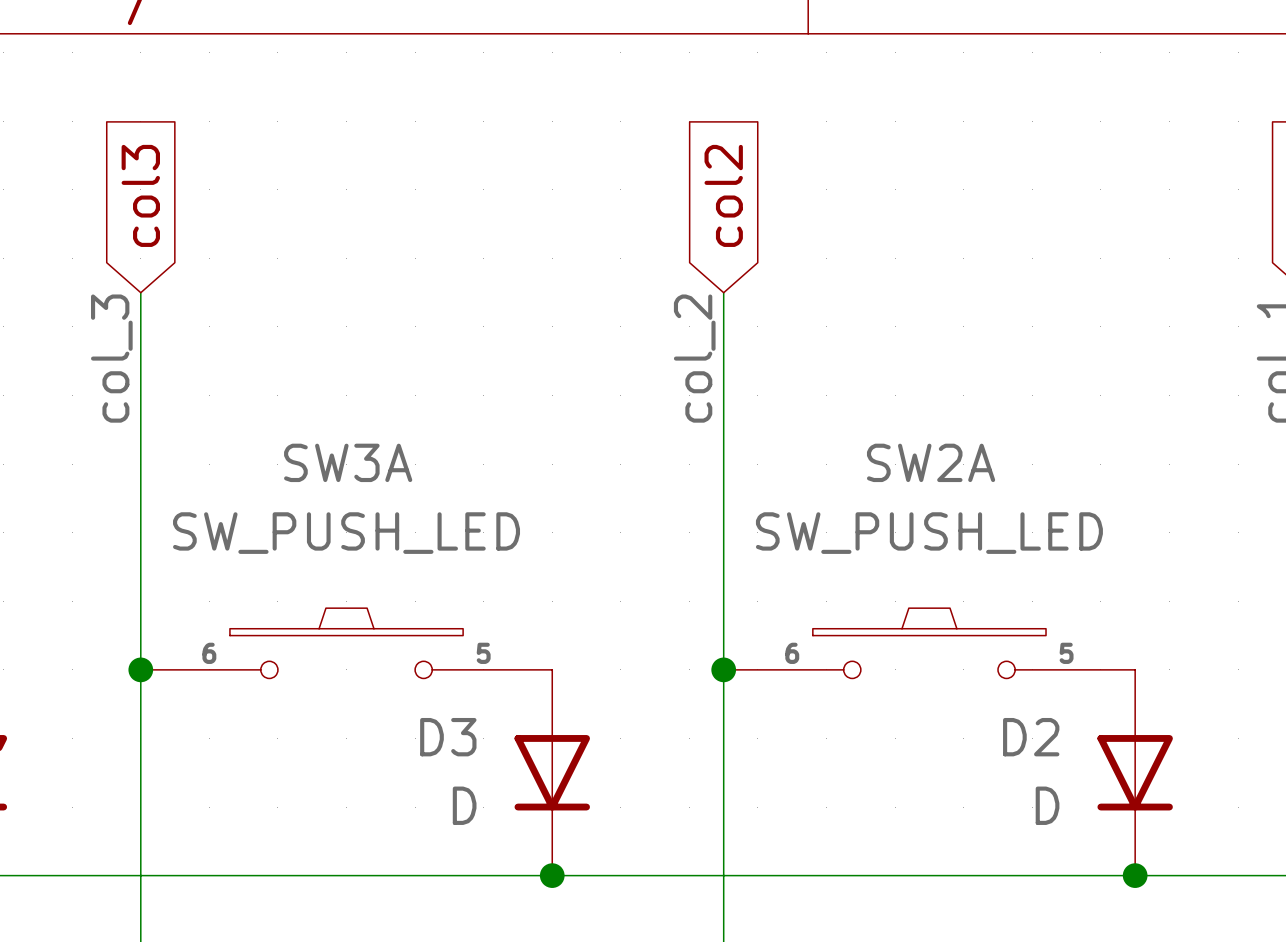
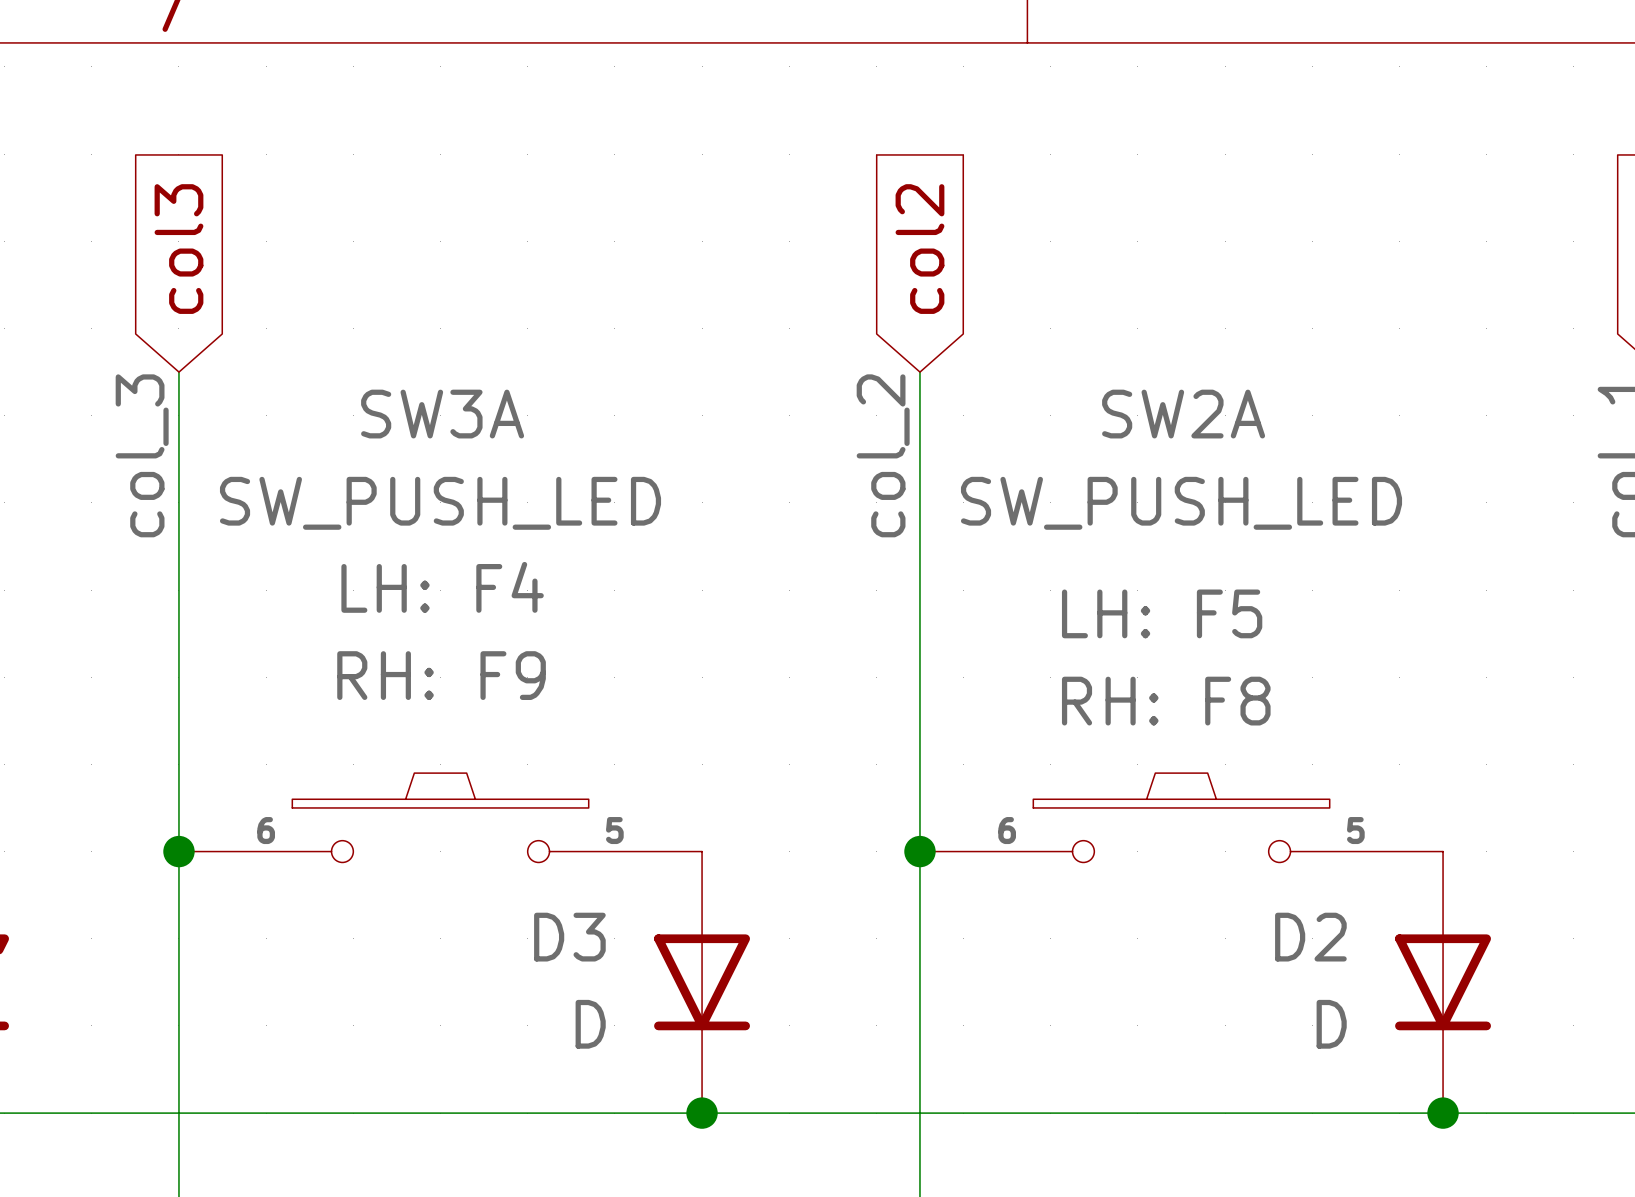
SW3A text: none -> LH: F4 (442, 587)
SW3A name position: SW3A (348, 462) -> SW3A (442, 414)
SW2A name position: SW2A (931, 462) -> SW2A (1183, 414)
SW2A text: none -> LH: F5 (1162, 613)
SW3A text: none -> RH: F9 (441, 675)
SW3A value position: SW_PUSH_LED (346, 533) -> SW_PUSH_LED (440, 503)
SW2A value position: SW_PUSH_LED (929, 533) -> SW_PUSH_LED (1181, 503)
SW2A text: none -> RH: F8 (1166, 701)

